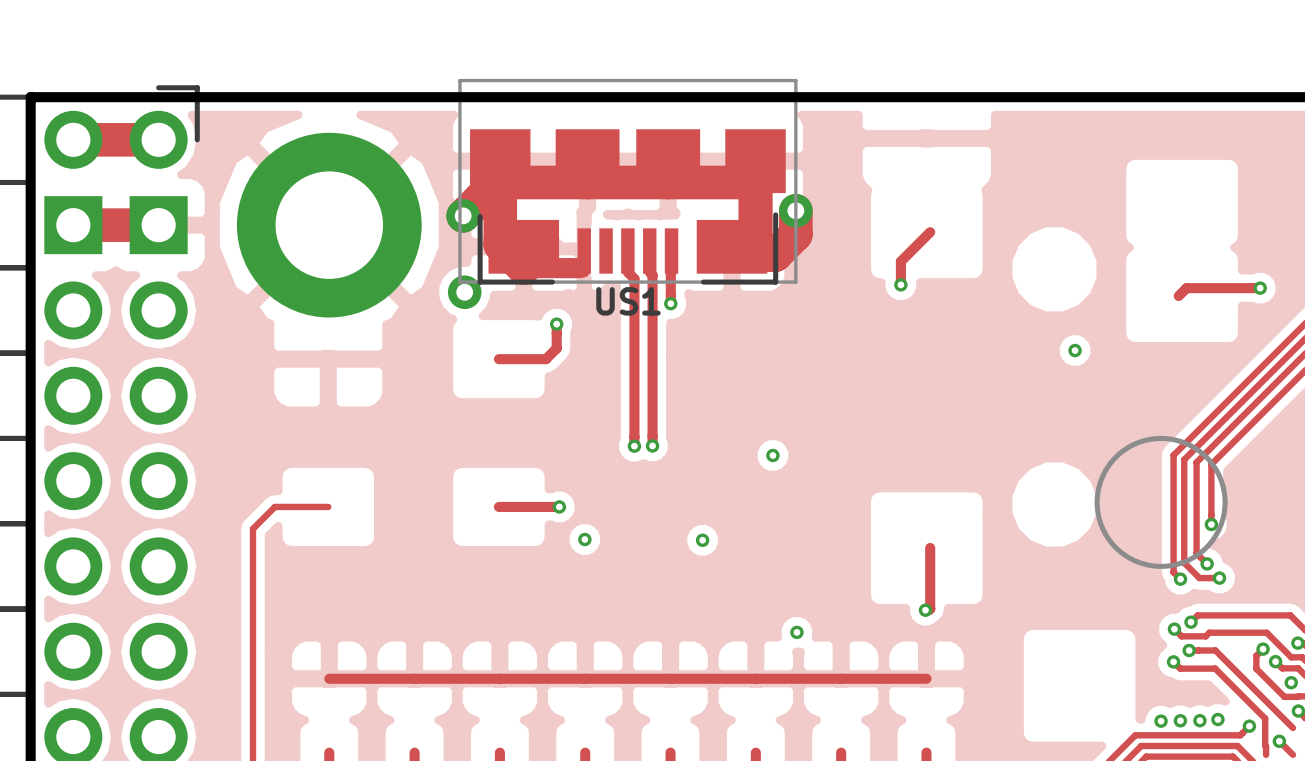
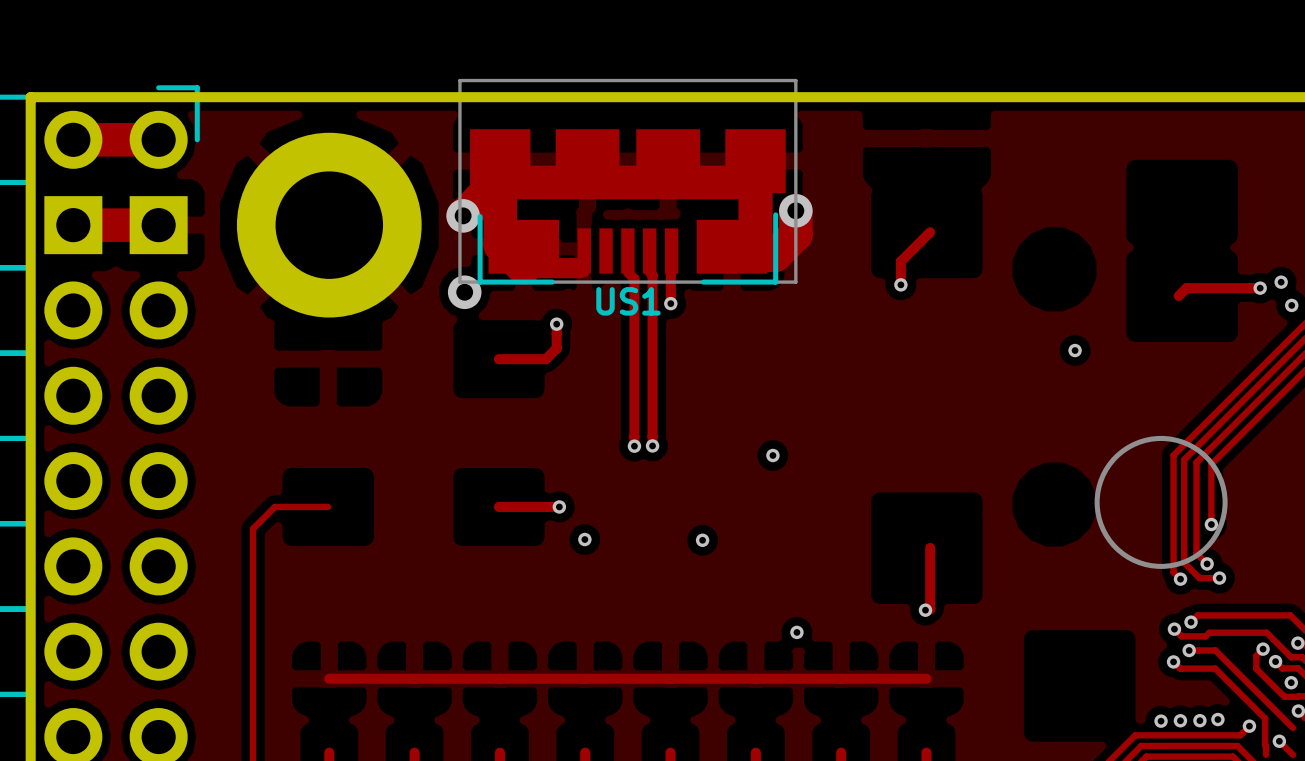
via: none -> (1281, 282)
via: none -> (1291, 305)

